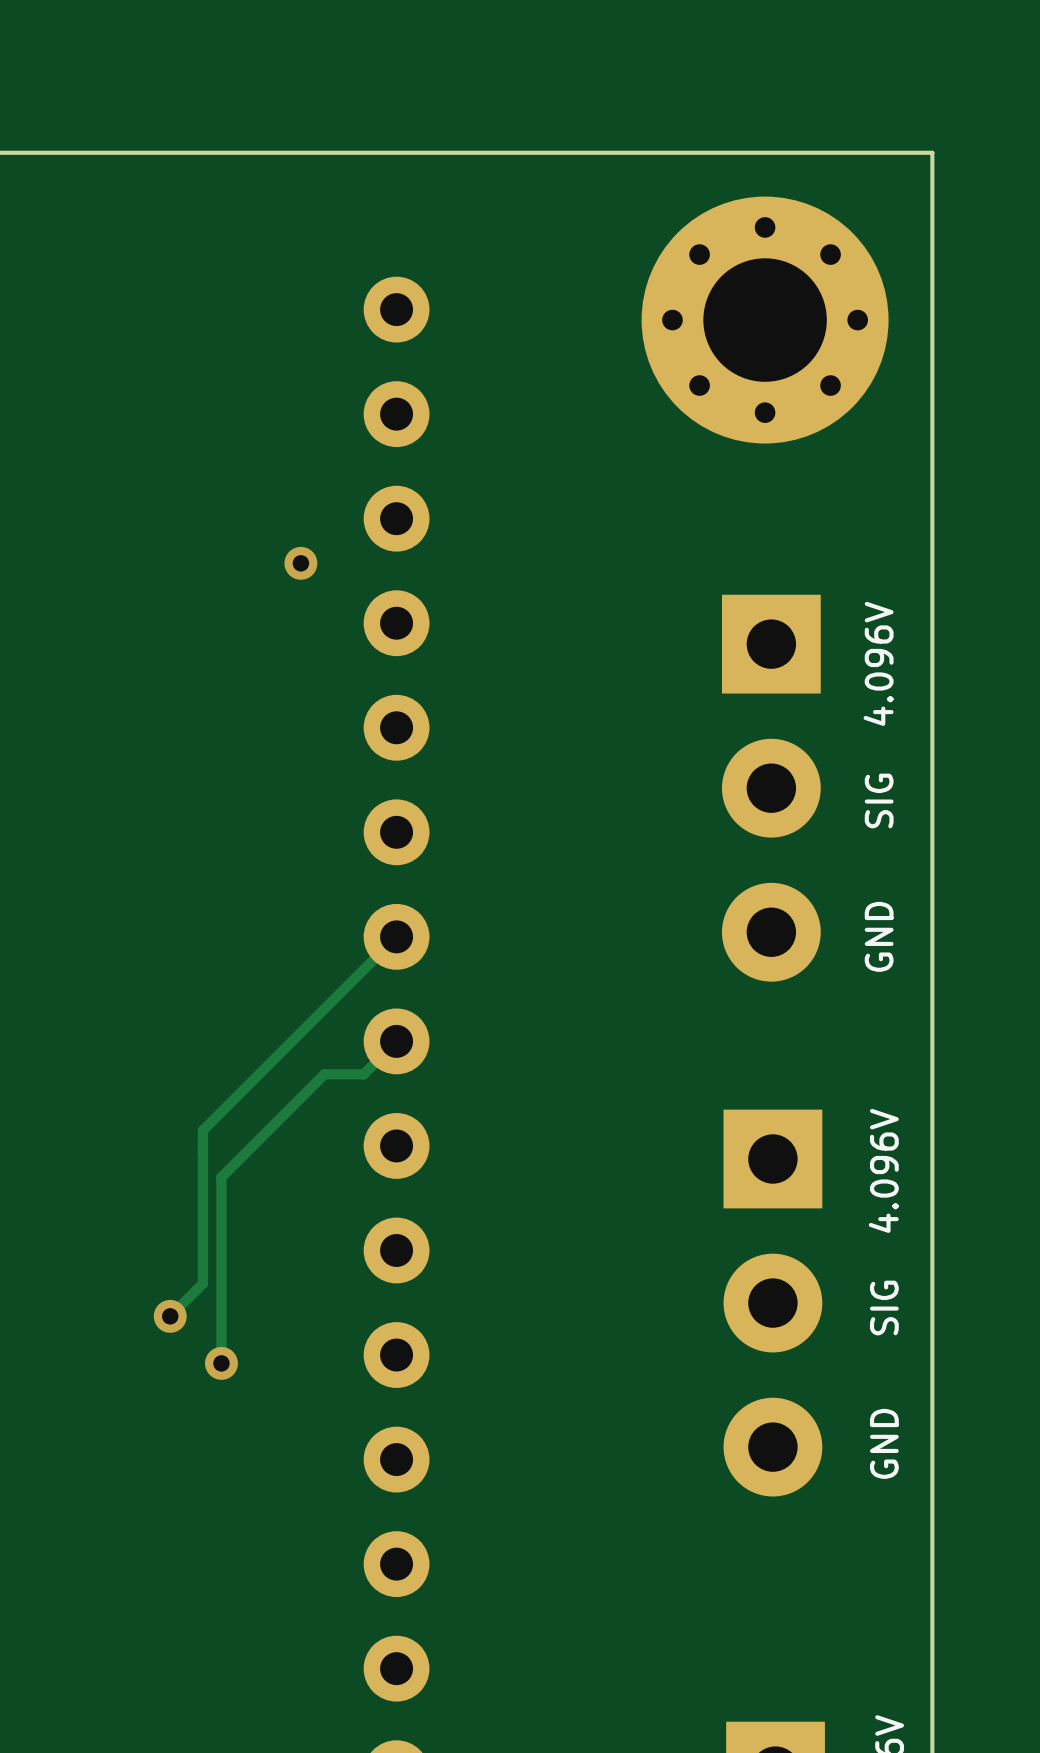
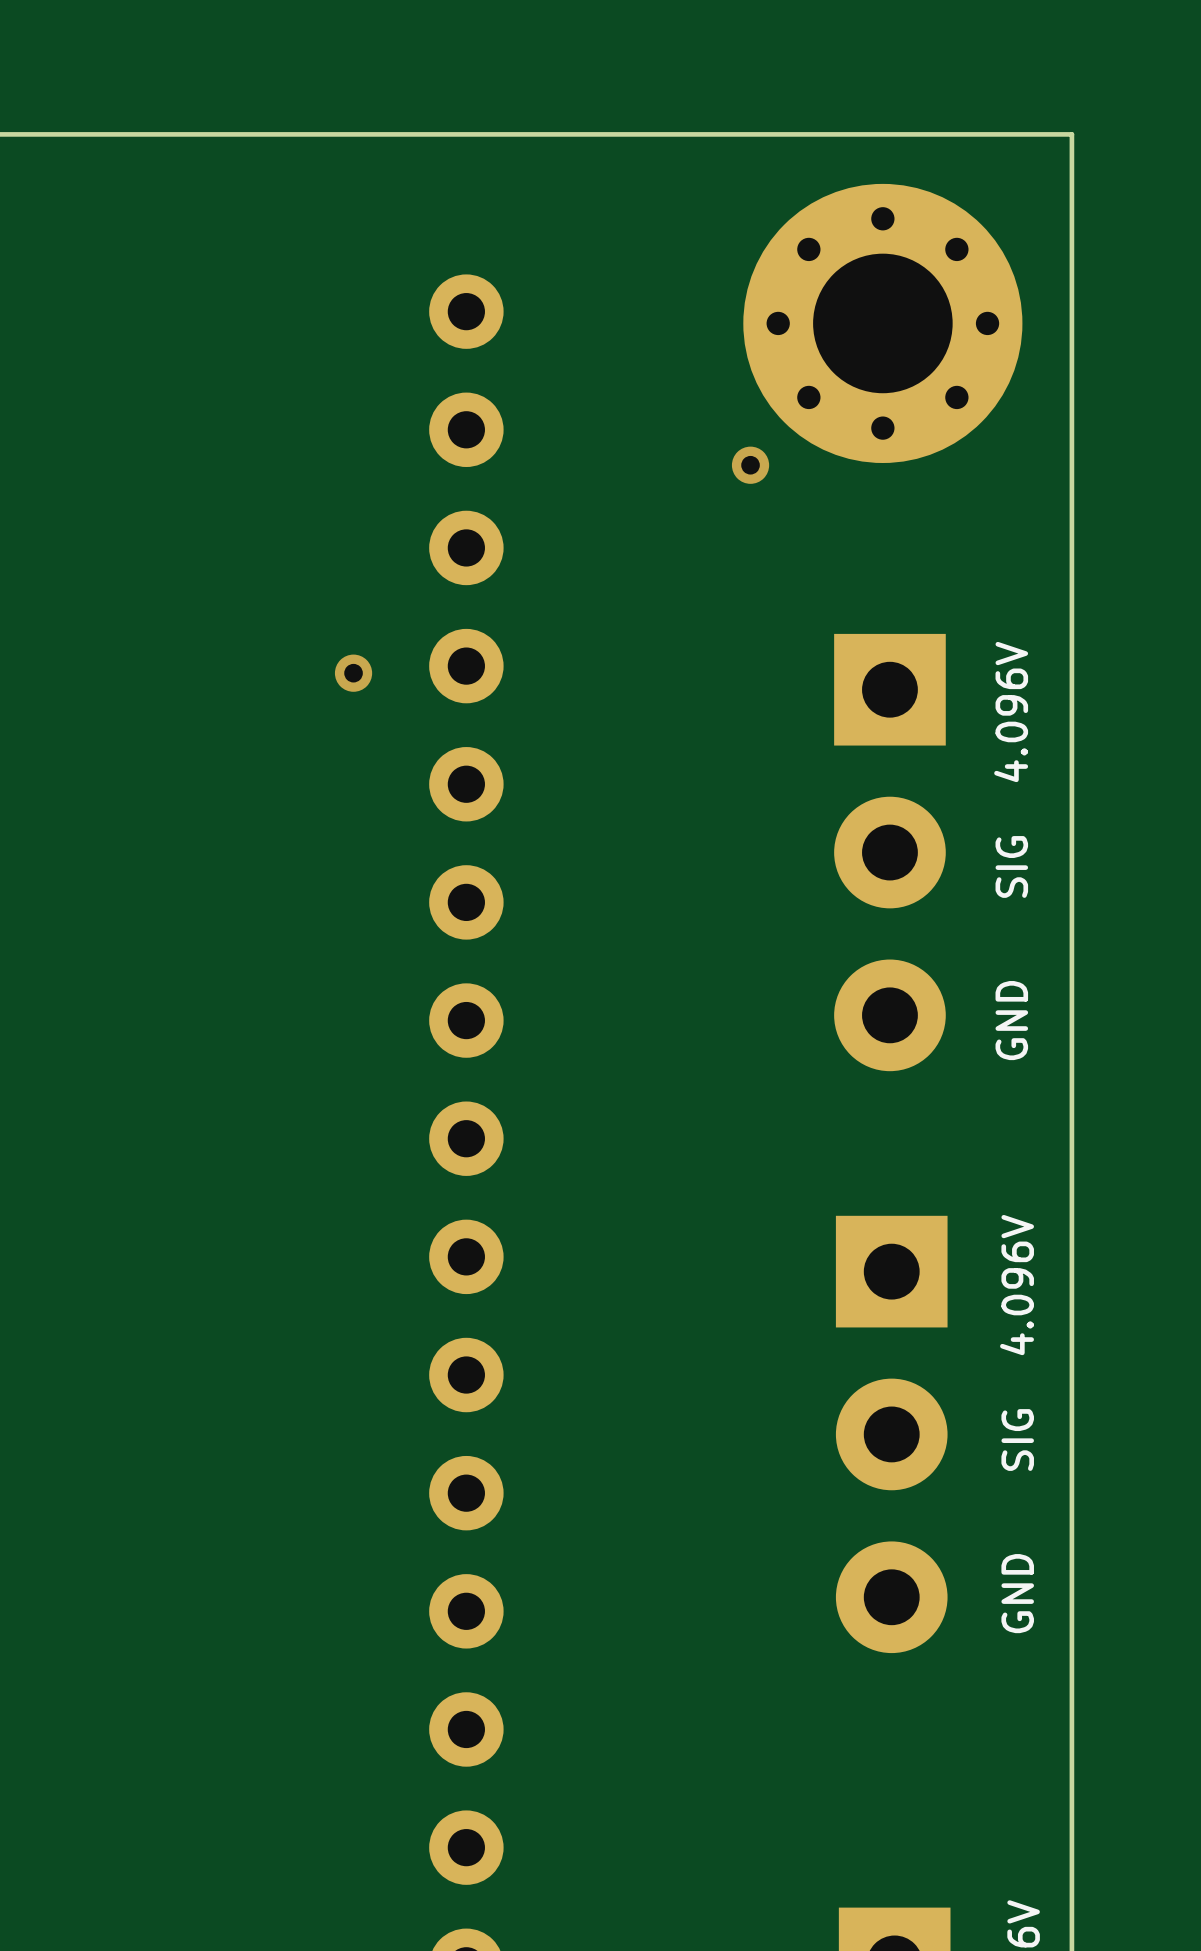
via: none -> (750, 465)
via position: (300, 563) -> (353, 673)
track: (396, 936) (202, 1130) (202, 1283) (170, 1316) -> none
track: (396, 1041) (363, 1074) (324, 1074) (221, 1177) (221, 1363) -> none
via: (170, 1316) -> none
via: (221, 1363) -> none

